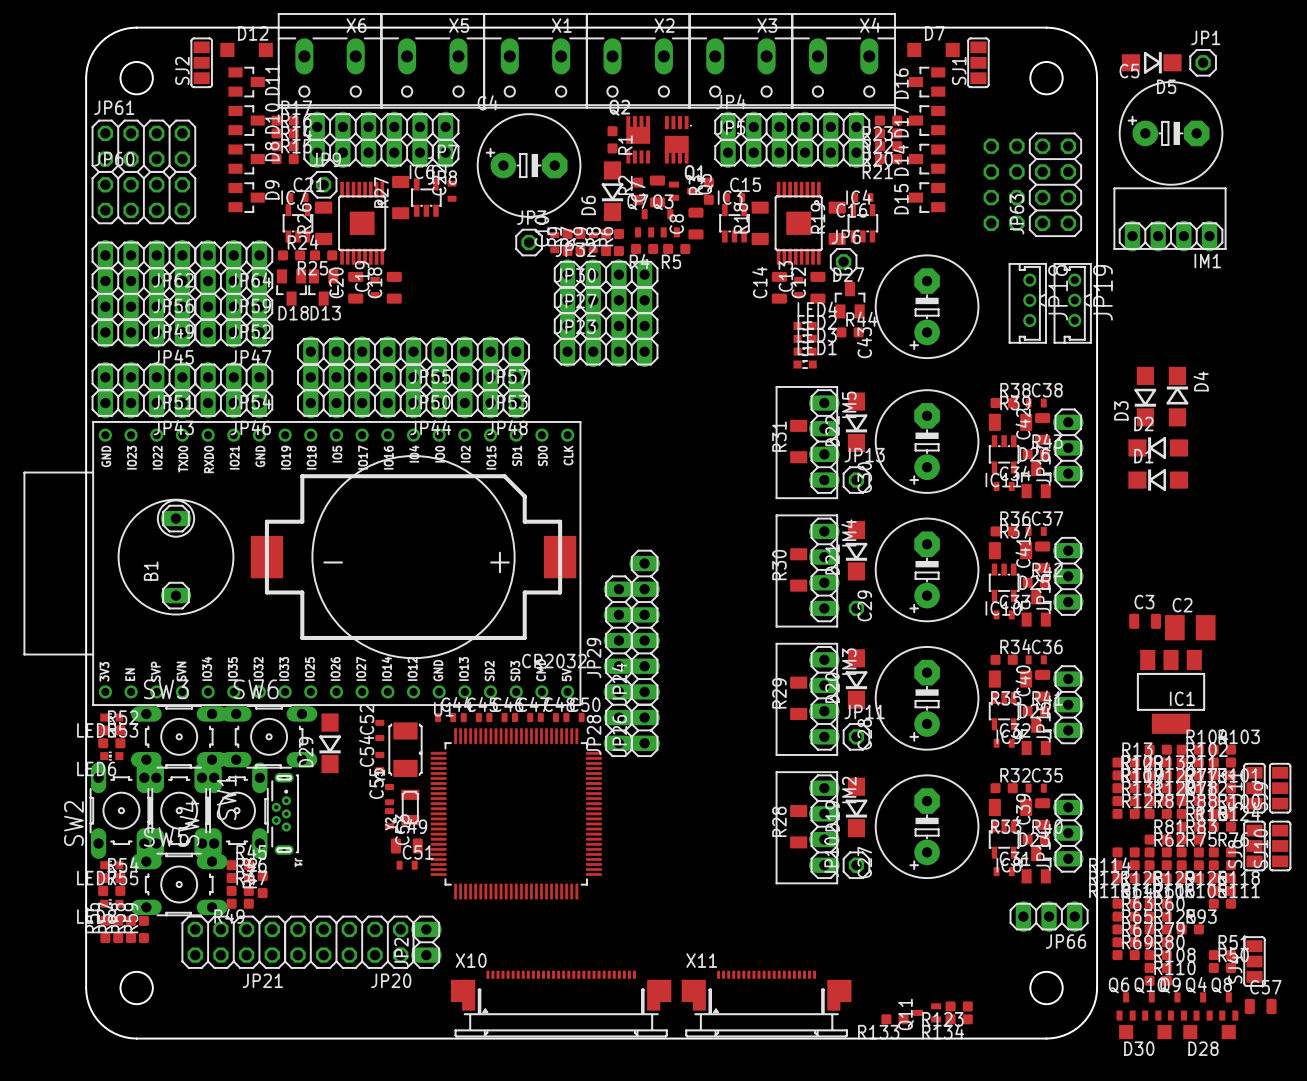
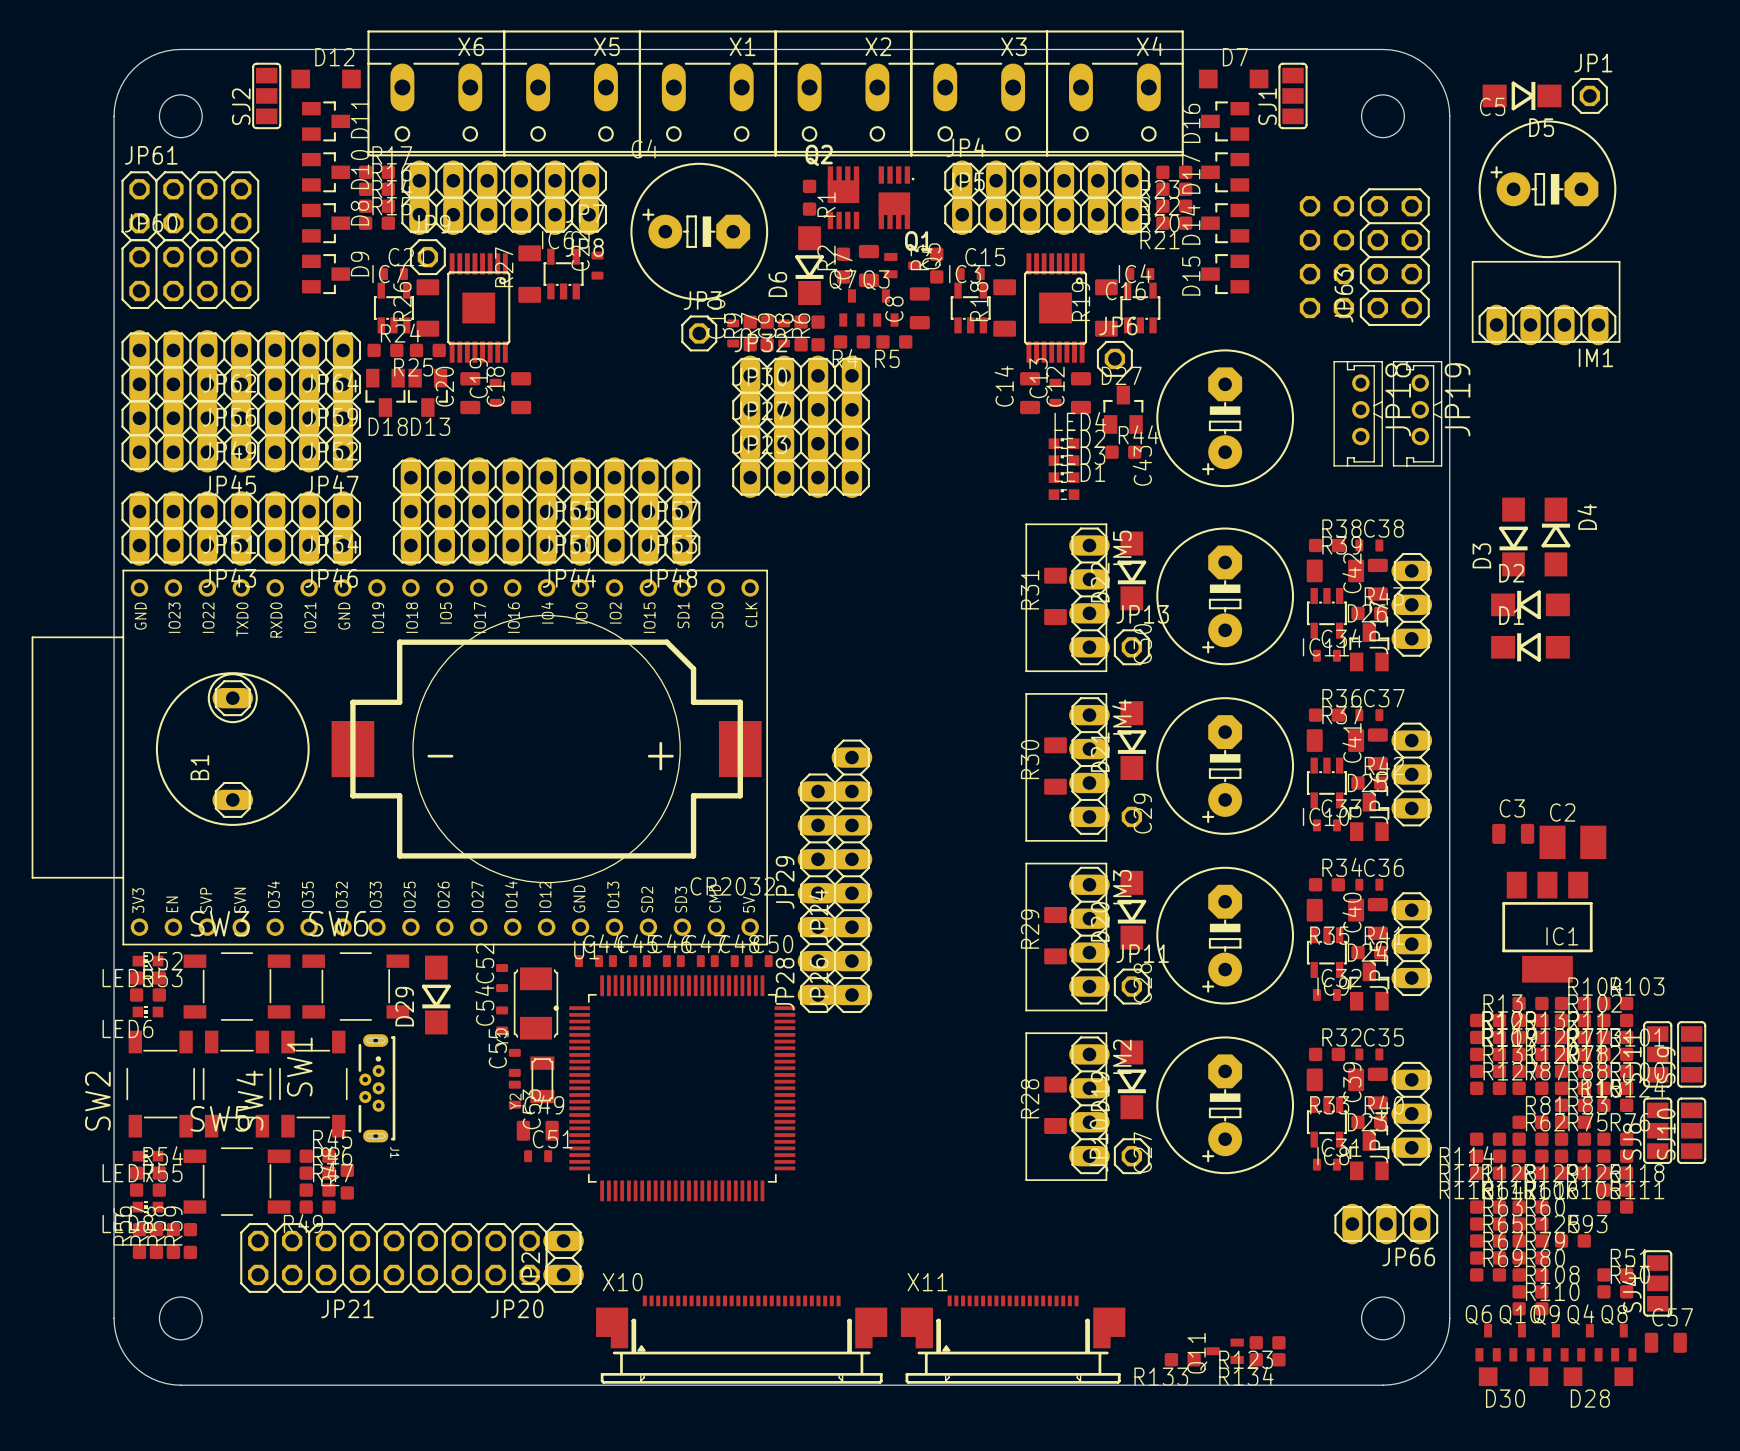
SW3 footprint: [130, 705, 228, 769] -> [183, 952, 291, 1021]
SW6 footprint: [220, 705, 318, 769] -> [302, 952, 410, 1021]
SW2 footprint: [89, 762, 154, 859] -> [126, 1030, 195, 1138]
SW1 footprint: [147, 762, 211, 859] -> [202, 1030, 272, 1138]
SW4 footprint: [205, 762, 269, 859] -> [279, 1030, 348, 1138]
SW5 footprint: [130, 852, 228, 917] -> [183, 1147, 291, 1216]

